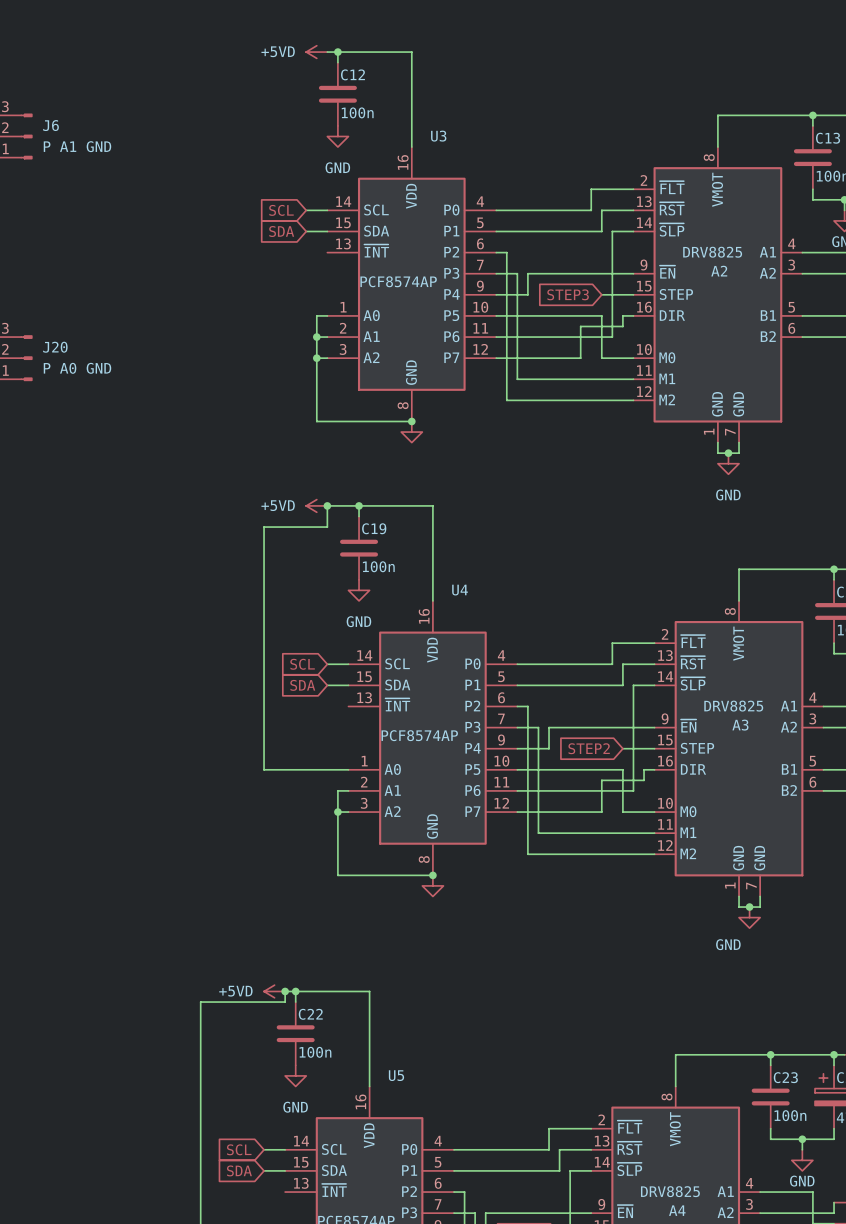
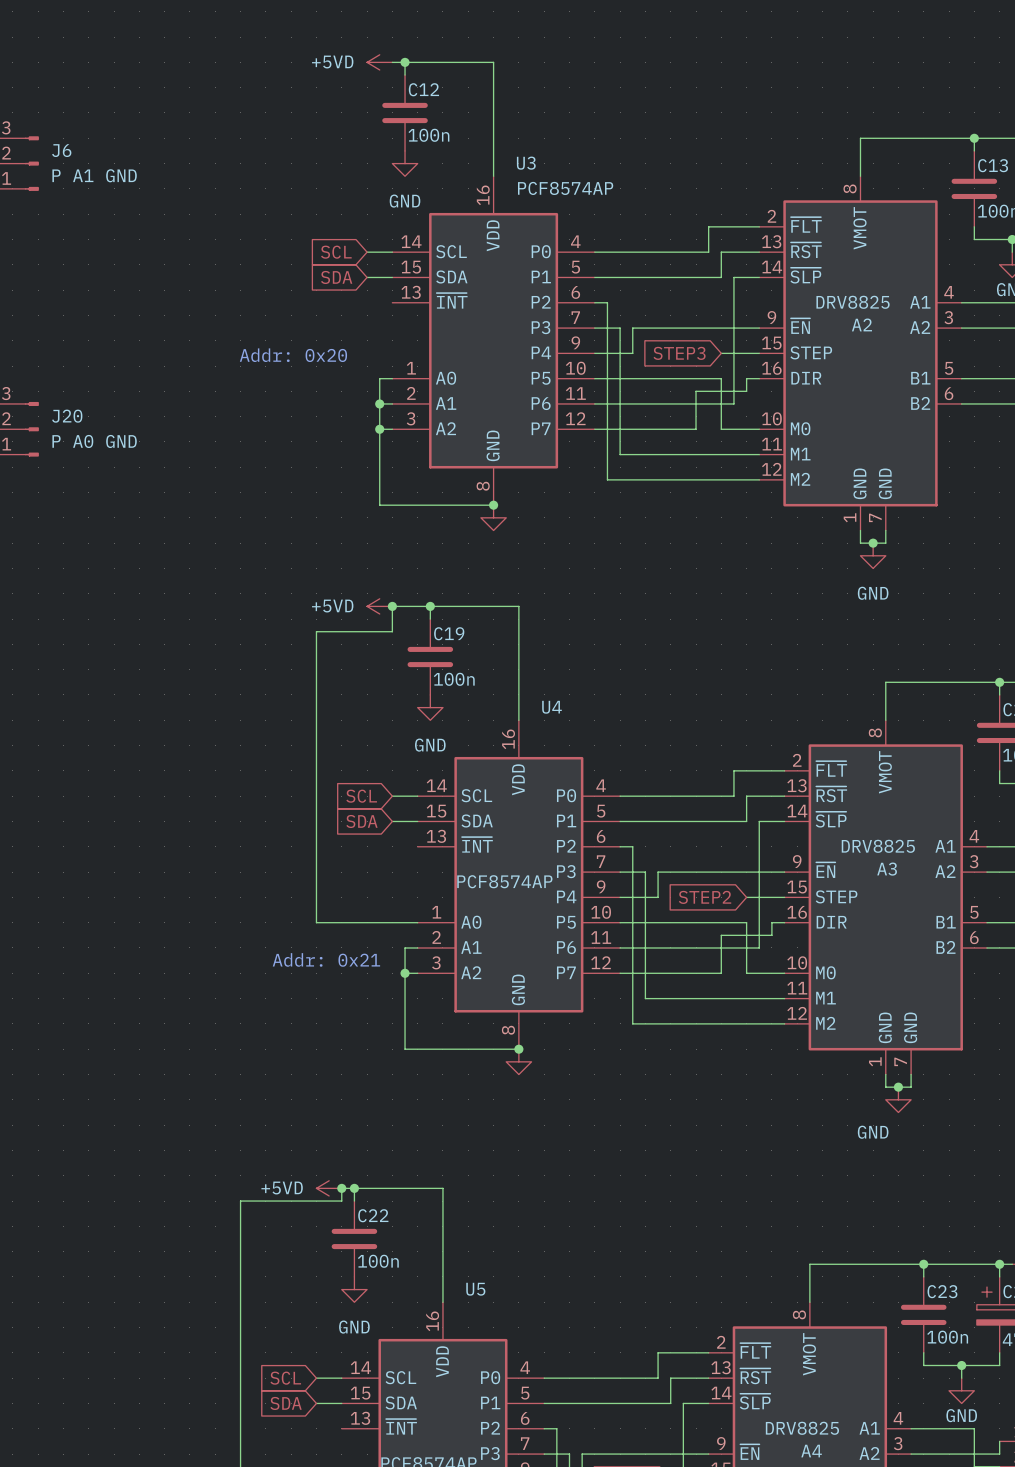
U3 value position: PCF8574AP (398, 281) -> PCF8574AP (565, 188)
text: none -> Addr: 0x20 (293, 355)
text: none -> Addr: 0x21 (326, 959)

